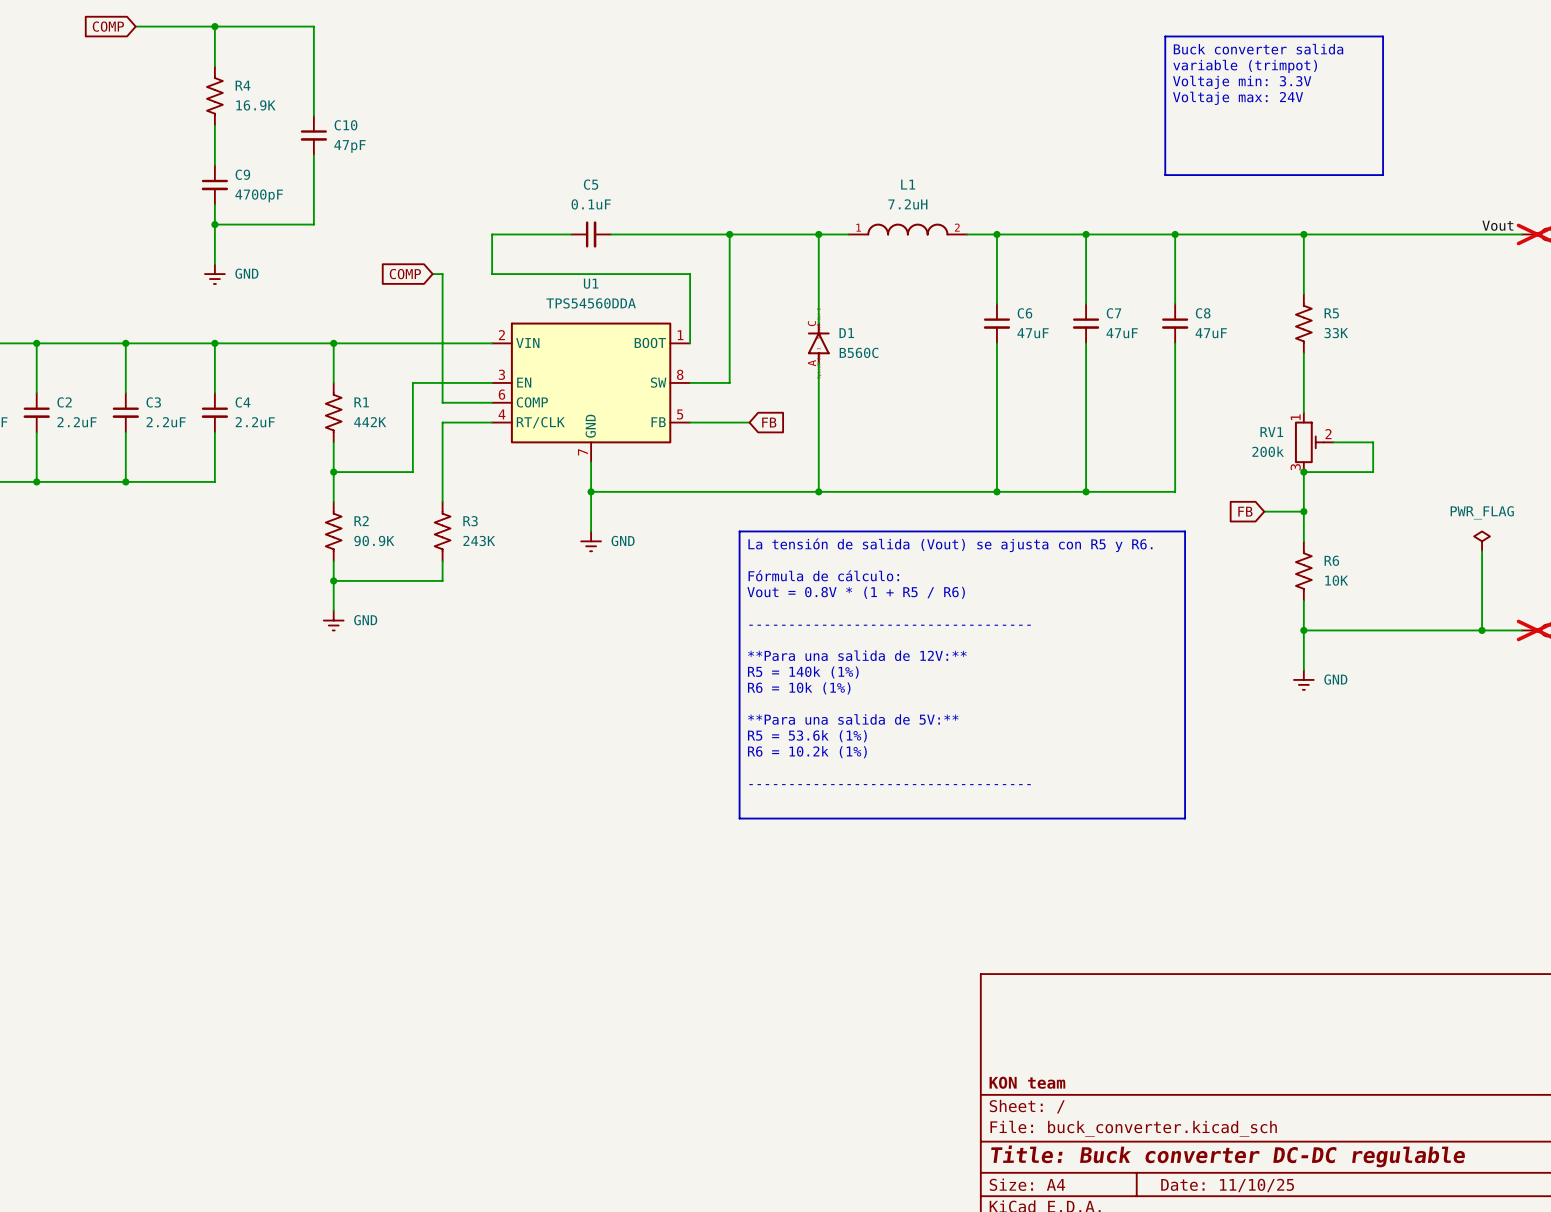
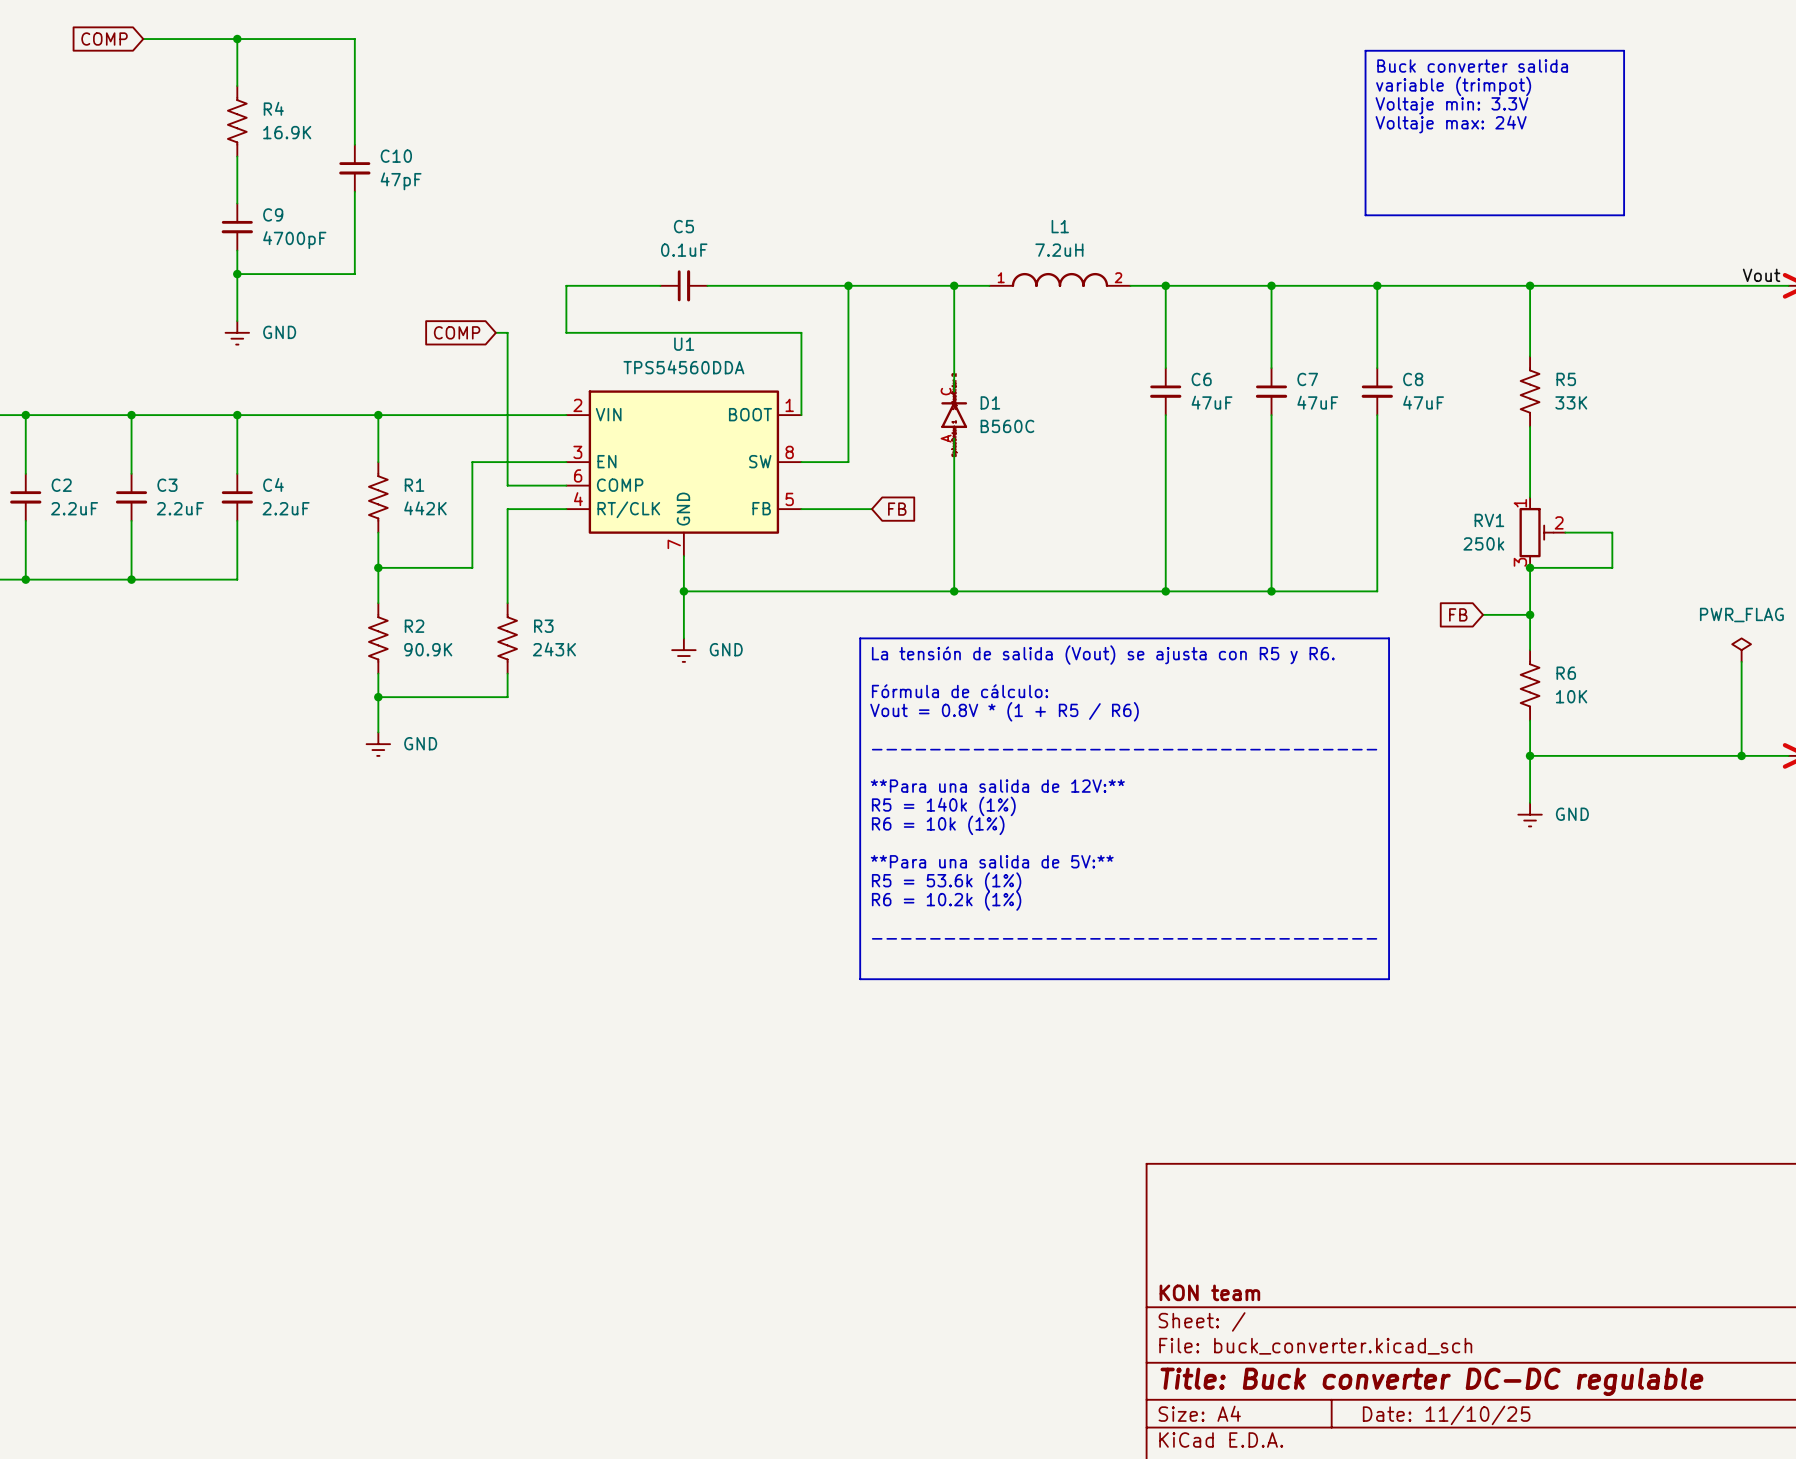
RV1 value: 200k (1268, 451) -> 250k (1483, 543)

